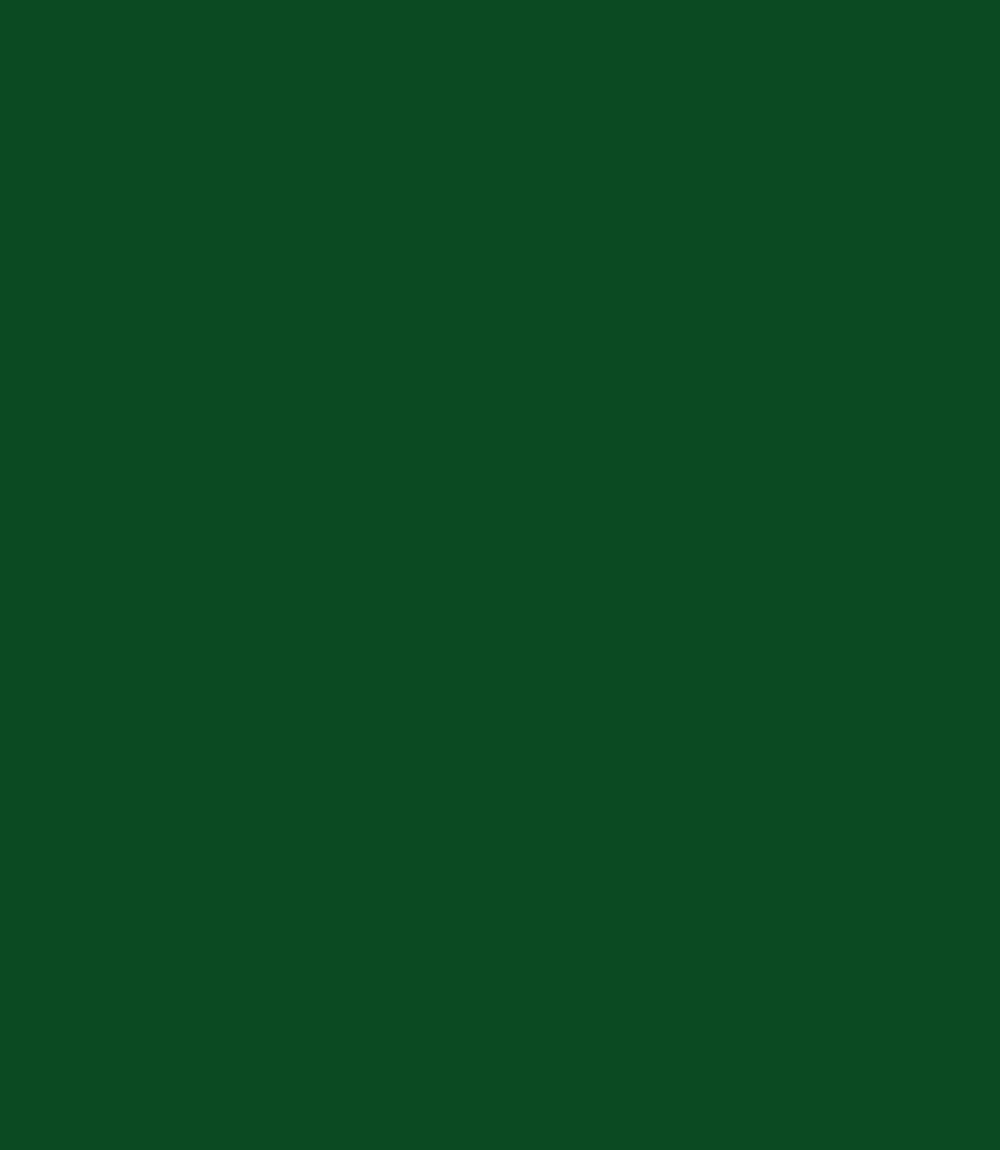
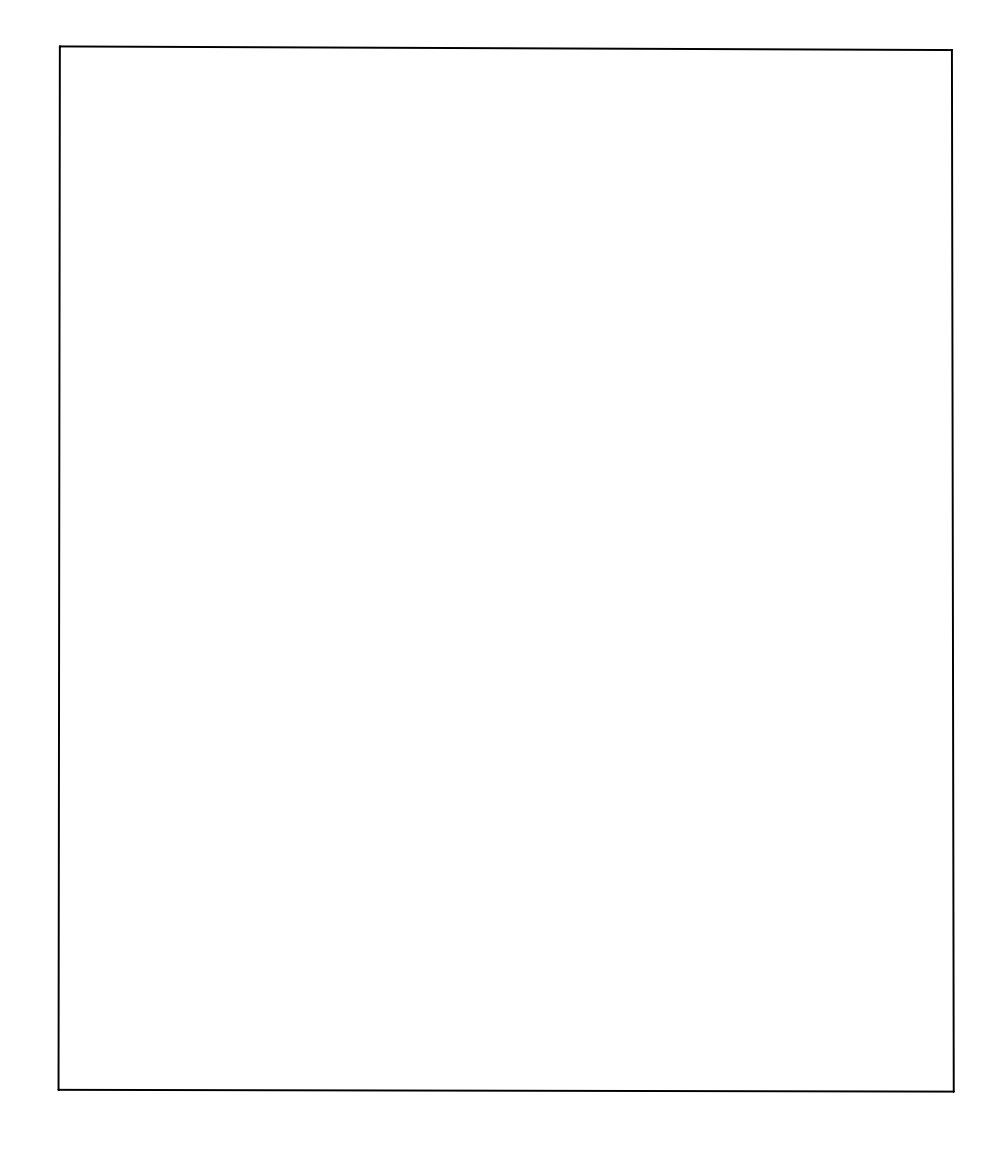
board edge: none -> (59, 46) (58, 1089) (953, 1091) (951, 50) (59, 46)

